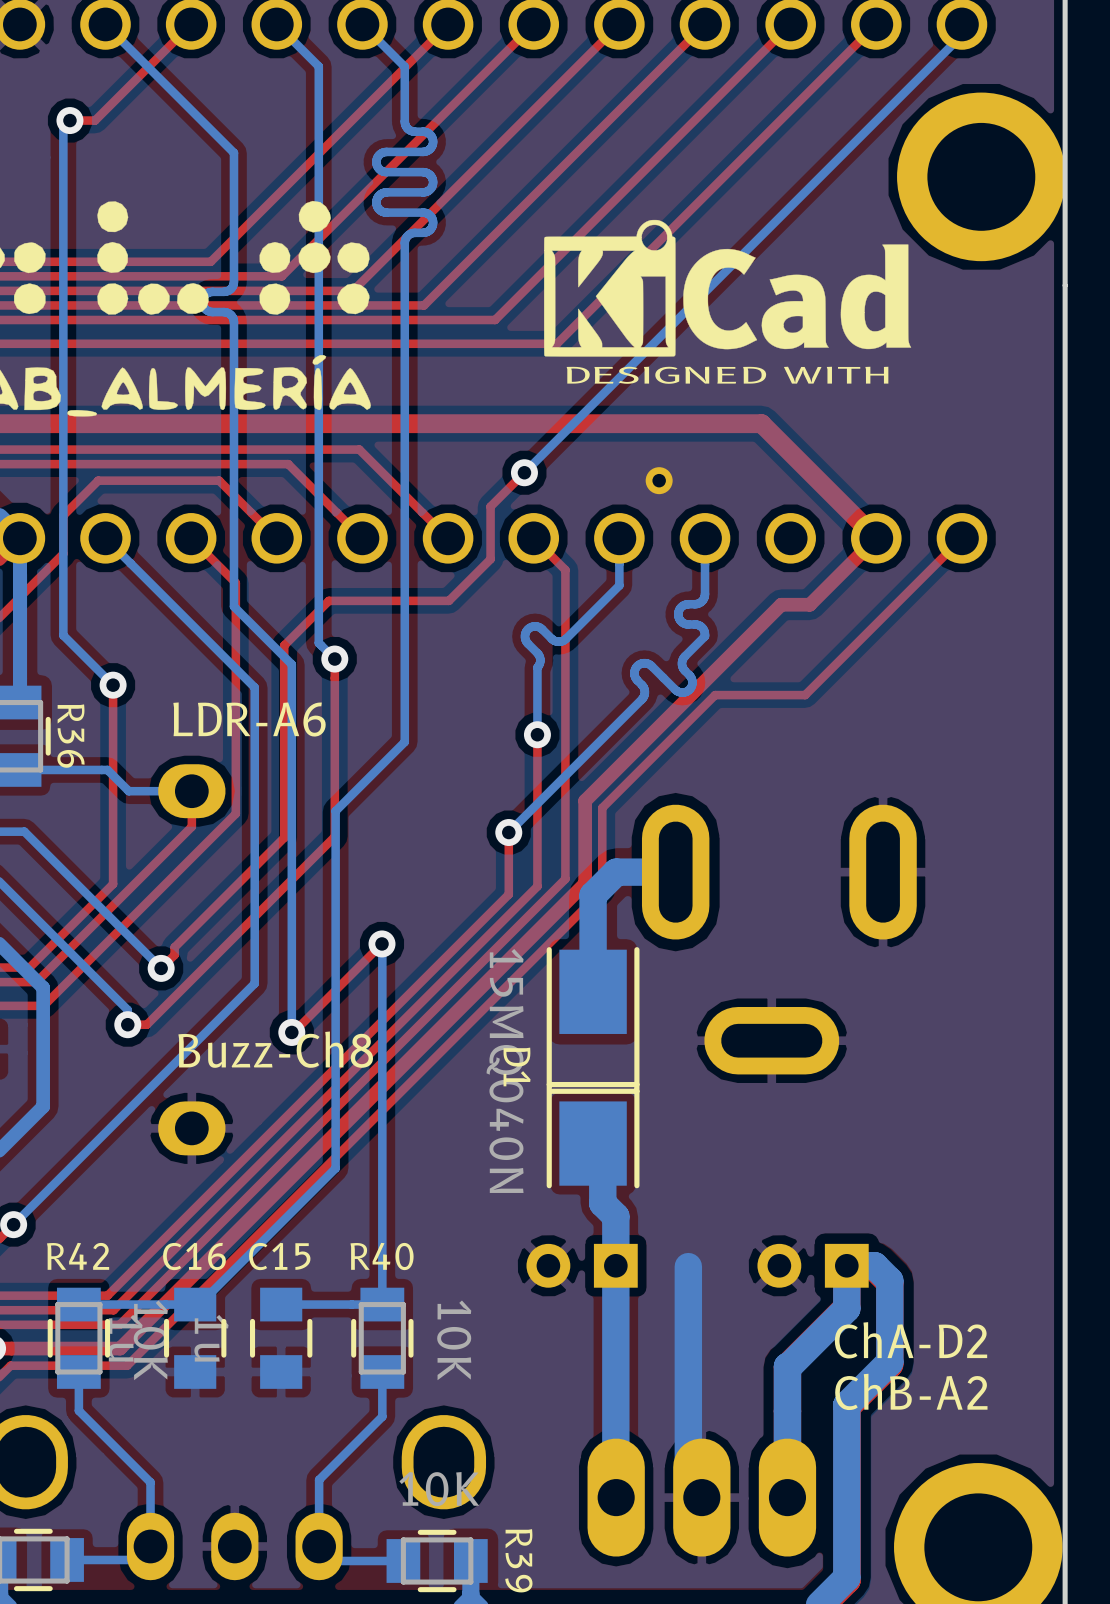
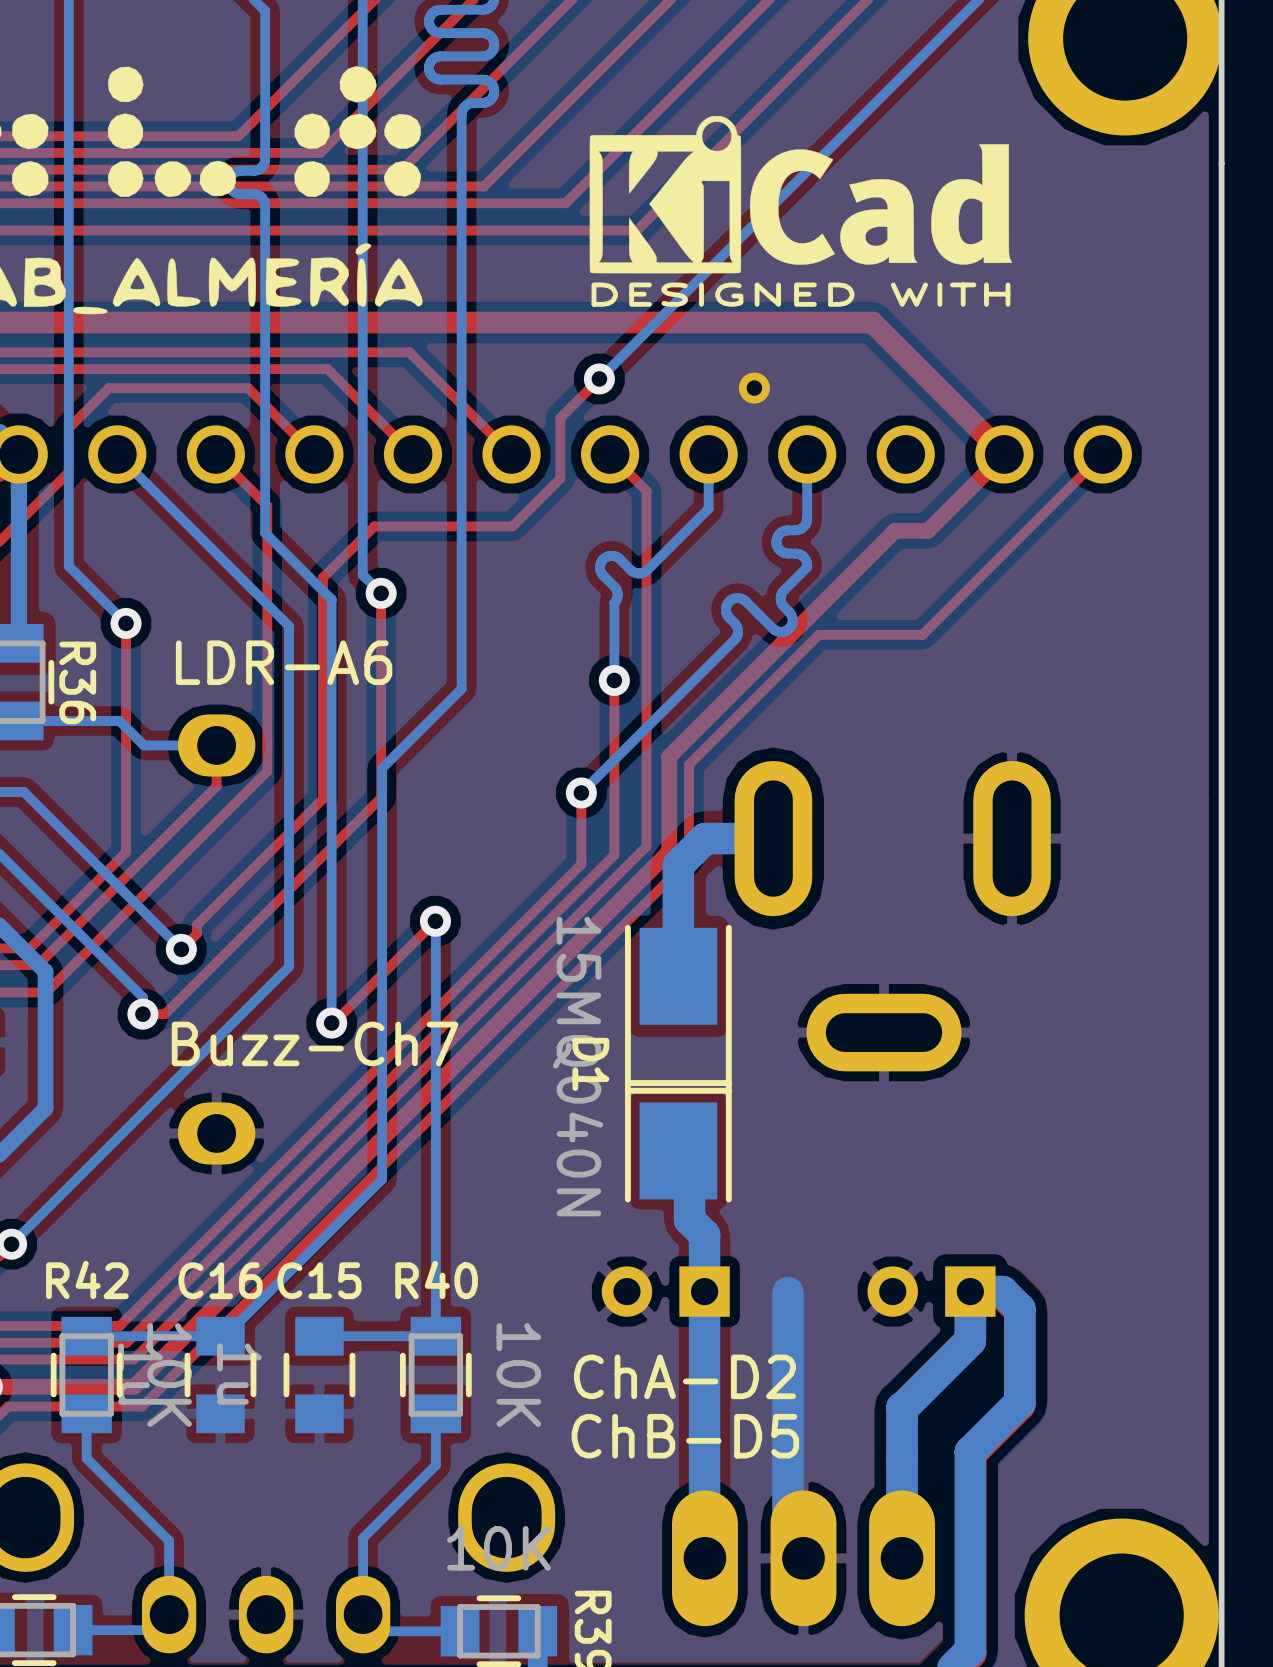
drawing position: (727, 288) -> (800, 194)
text: Buzz-Ch8 (275, 1049) -> Buzz-Ch7 (315, 1043)
text position: ChA-D2 (911, 1340) -> ChA-D2 (684, 1376)
text: none -> ChB-D5 (685, 1436)
text: ChB-A2 (911, 1391) -> none

